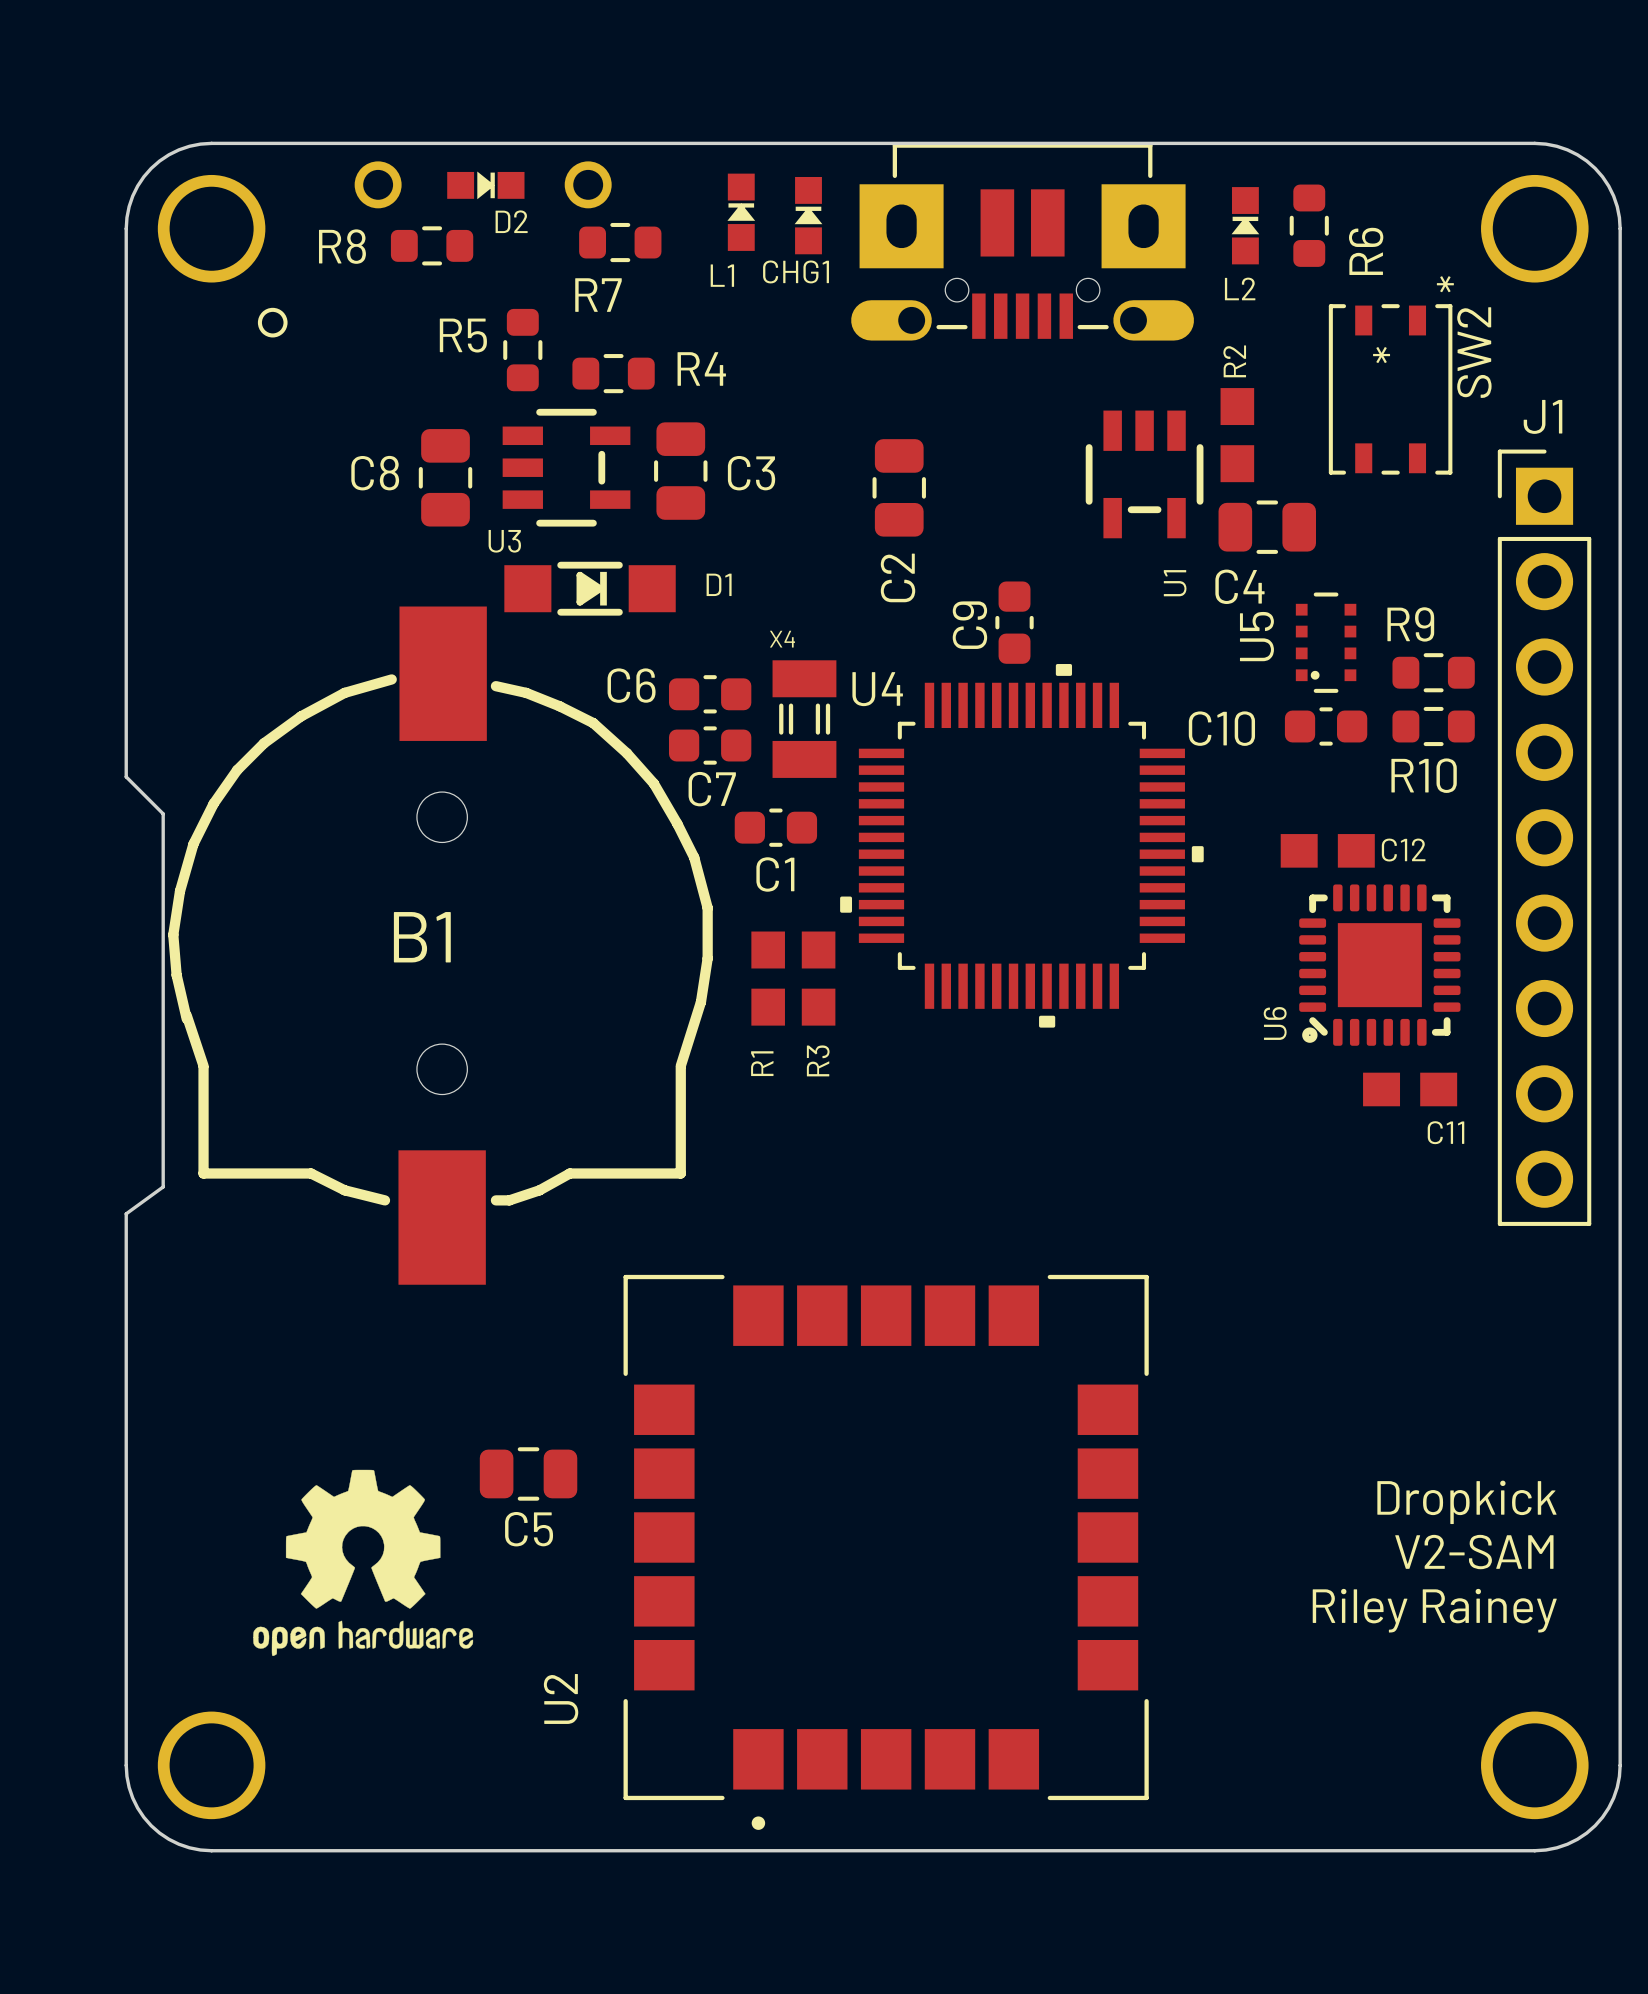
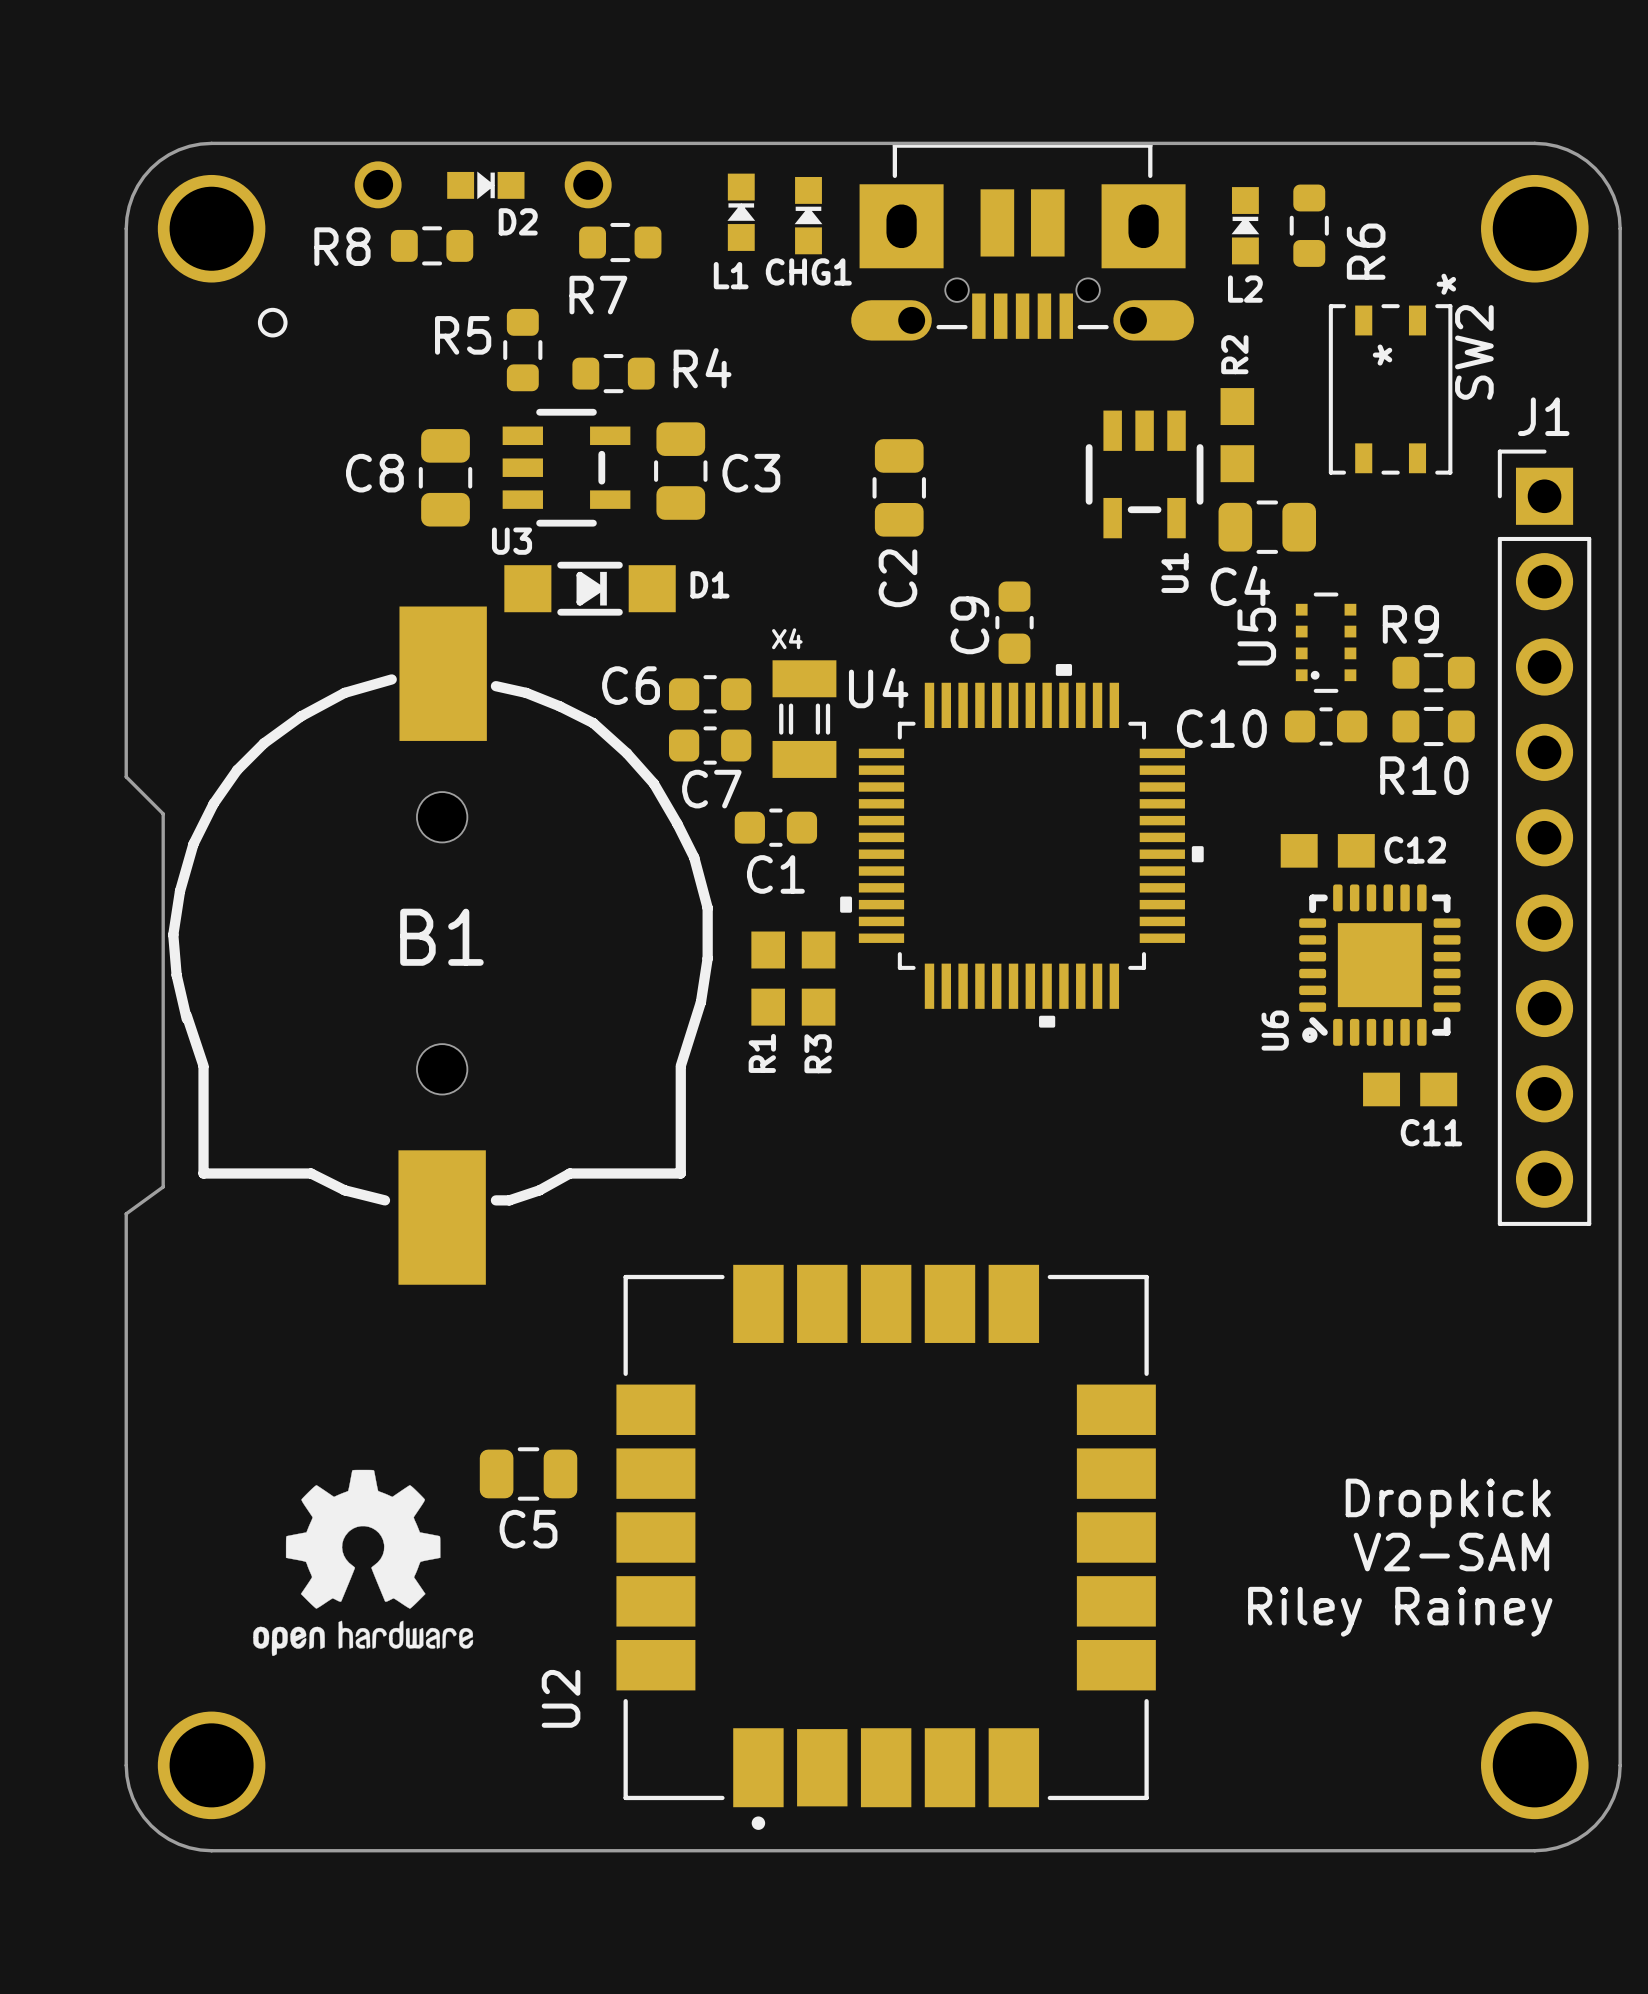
U2 footprint: [623, 1274, 1149, 1830] -> [616, 1264, 1156, 1830]

